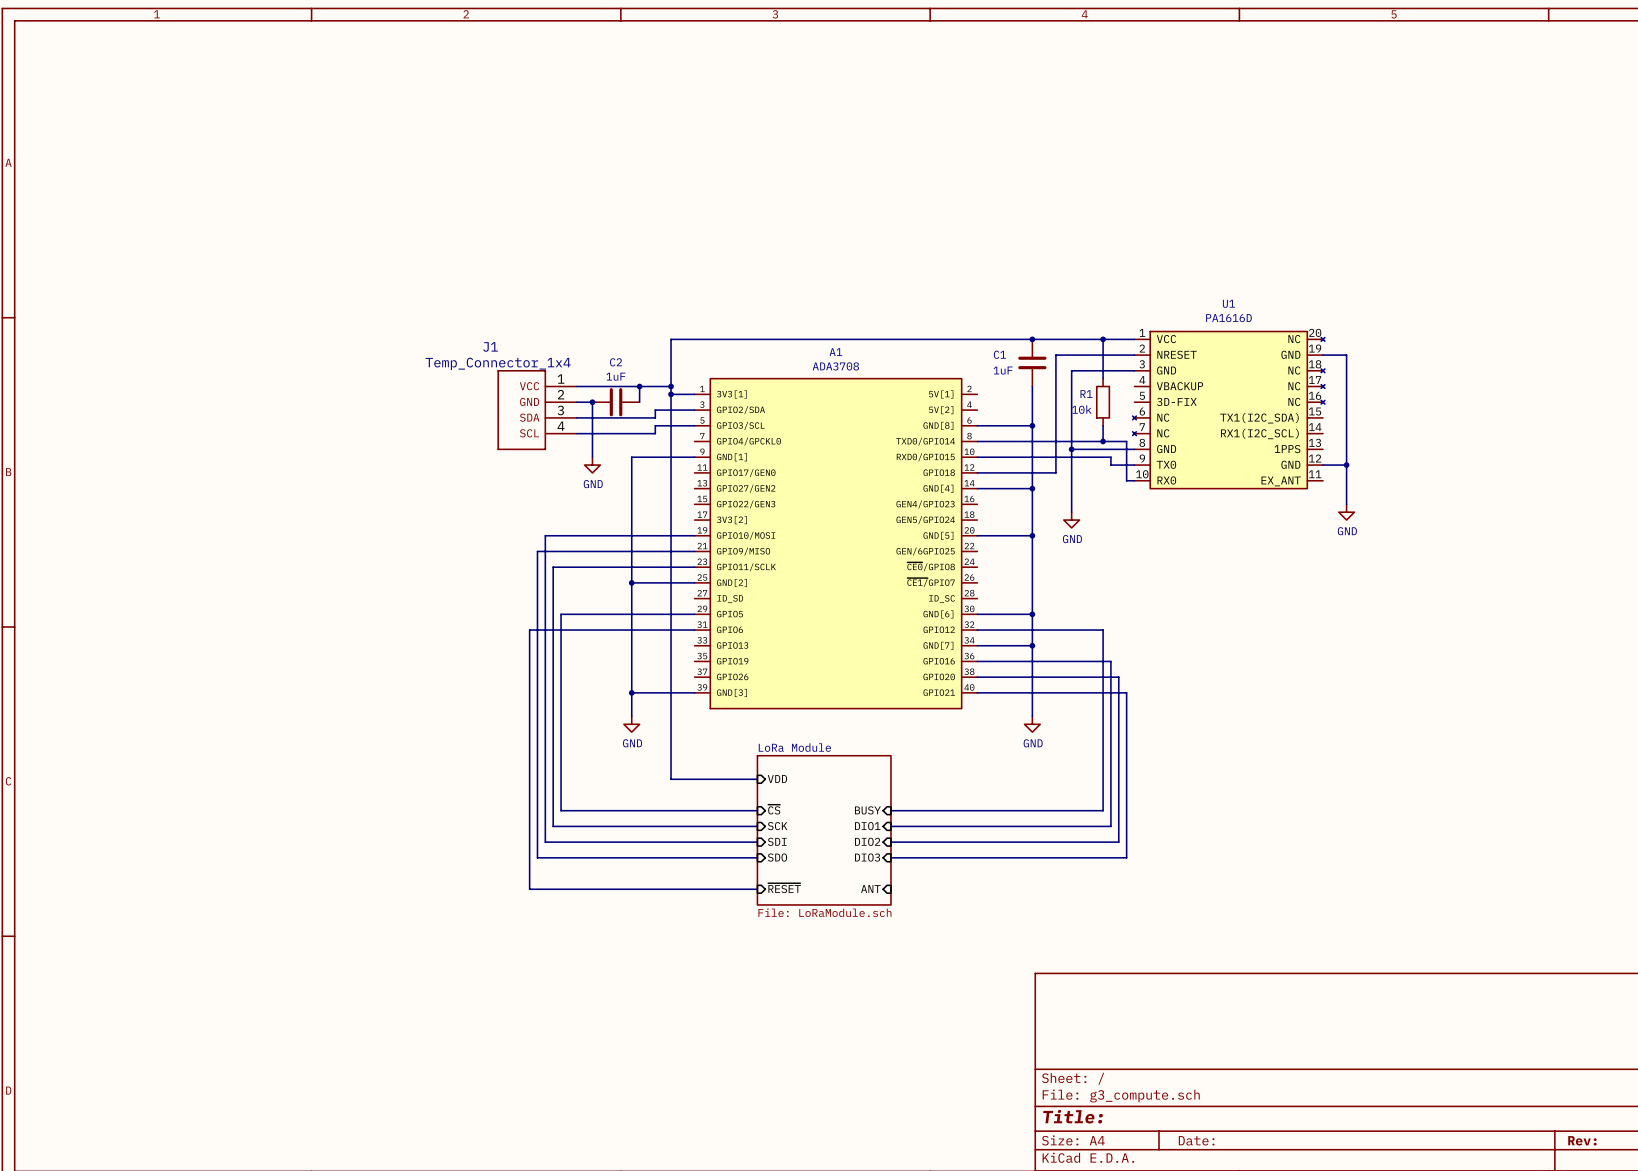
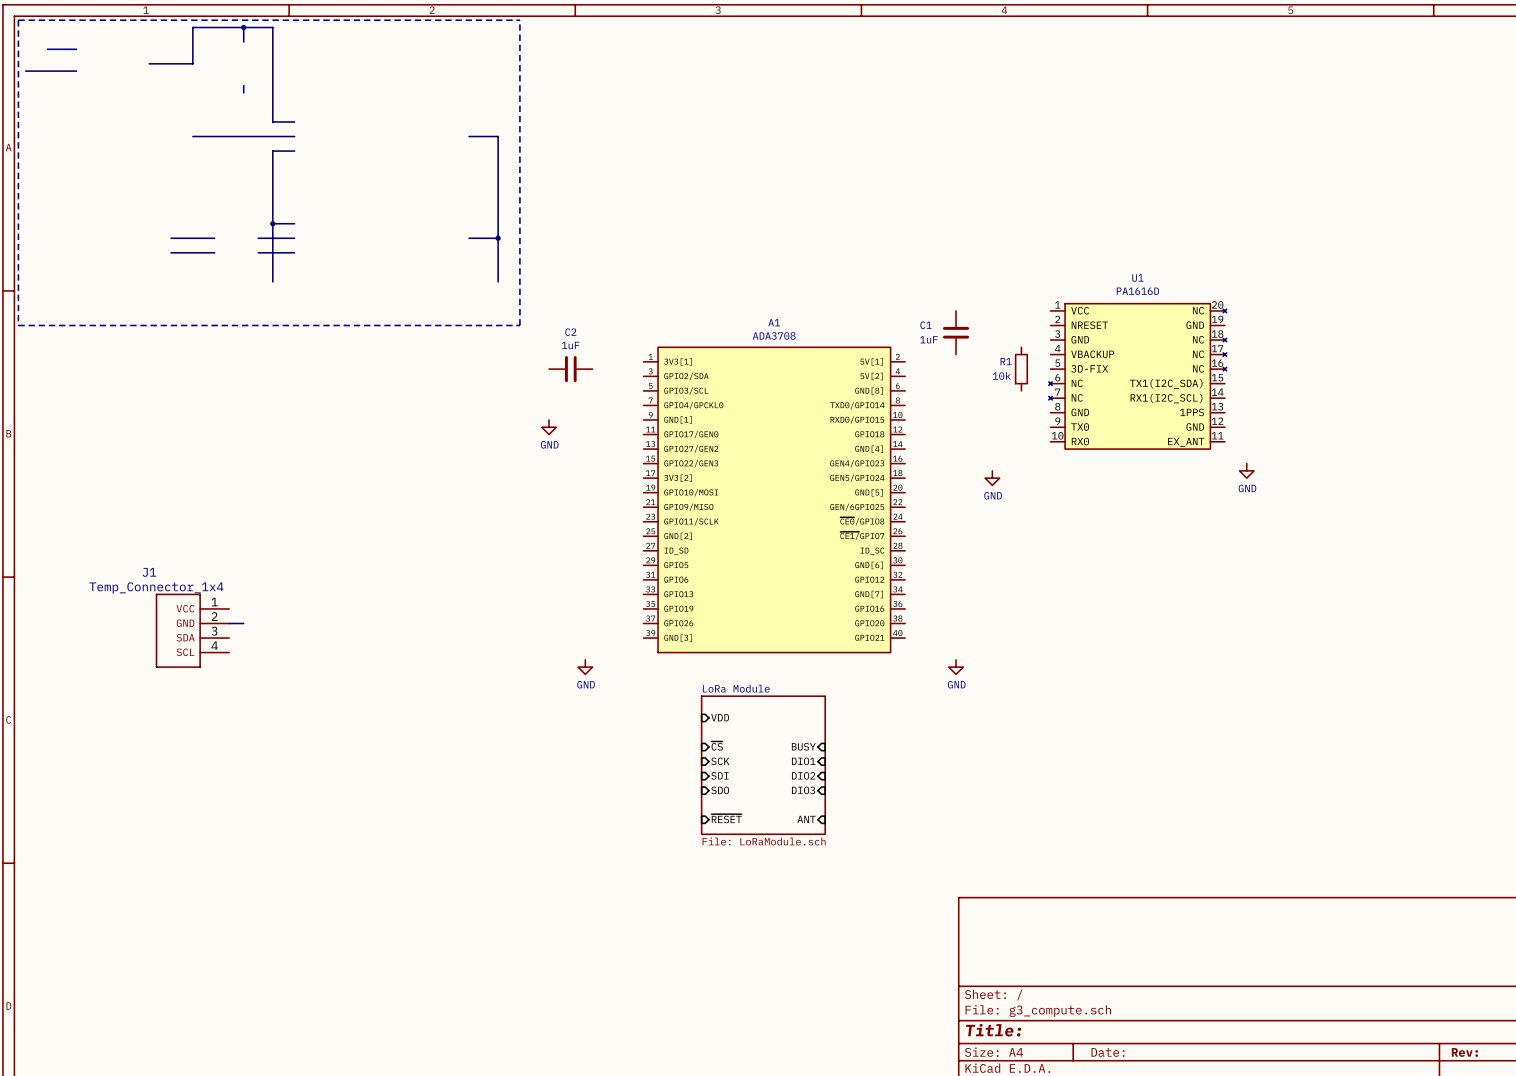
line: none -> (18, 20) (18, 325) (519, 325) (519, 20) (18, 20)
wire: none -> (243, 27) (243, 42)
junction: none -> (243, 27)
wire: none -> (47, 49) (76, 49)
wire: none -> (149, 63) (192, 63) (192, 27) (272, 27) (272, 121) (294, 121)
wire: none -> (25, 71) (76, 71)
wire: none -> (243, 85) (243, 92)
wire: none -> (192, 136) (294, 136)
wire: none -> (469, 136) (498, 136) (498, 281)
wire: none -> (294, 151) (272, 151) (272, 281)
wire: none -> (272, 223) (294, 223)
junction: none -> (272, 223)
wire: none -> (171, 238) (214, 238)
wire: none -> (258, 238) (294, 238)
wire: none -> (469, 238) (498, 238)
junction: none -> (498, 238)
wire: none -> (171, 252) (214, 252)
wire: none -> (258, 252) (294, 252)
junction: (1032, 339) -> none
wire: (1103, 339) (1103, 378) -> none
junction: (1103, 339) -> none
wire: (1134, 339) (671, 339) (671, 779) (757, 779) -> none
wire: (1134, 355) (1055, 355) (1055, 472) (977, 472) -> none
wire: (1323, 355) (1346, 355) (1346, 504) -> none
wire: (1134, 370) (1071, 370) (1071, 512) -> none
wire: (576, 386) (671, 386) -> none
wire: (639, 386) (639, 402) -> none
junction: (639, 386) -> none
junction: (671, 386) -> none
wire: (1032, 386) (1032, 716) -> none
wire: (671, 394) (694, 394) -> none
junction: (671, 394) -> none
wire: (576, 402) (592, 402) (592, 457) -> none
junction: (592, 402) -> none
J1 position: (537, 410) -> (192, 630)
wire: (694, 410) (655, 410) (655, 417) (576, 417) -> none
wire: (694, 425) (655, 425) (655, 433) (576, 433) -> none
wire: (977, 425) (1032, 425) -> none
junction: (1032, 425) -> none
wire: (1103, 425) (1103, 441) -> none
wire: (977, 441) (1126, 441) (1126, 480) (1134, 480) -> none
junction: (1103, 441) -> none
wire: (1071, 449) (1134, 449) -> none
junction: (1071, 449) -> none
wire: (694, 457) (631, 457) (631, 716) -> none
wire: (977, 457) (1110, 457) (1110, 465) (1134, 465) -> none
wire: (1323, 465) (1346, 465) -> none
junction: (1346, 465) -> none
wire: (977, 488) (1032, 488) -> none
junction: (1032, 488) -> none
wire: (694, 535) (545, 535) (545, 842) (757, 842) -> none
wire: (977, 535) (1032, 535) -> none
junction: (1032, 535) -> none
wire: (694, 551) (537, 551) (537, 857) (757, 857) -> none
wire: (694, 567) (553, 567) (553, 826) (757, 826) -> none
wire: (631, 582) (694, 582) -> none
junction: (631, 582) -> none
wire: (694, 614) (561, 614) (561, 810) (757, 810) -> none
wire: (977, 614) (1032, 614) -> none
junction: (1032, 614) -> none
wire: (694, 630) (529, 630) (529, 889) (757, 889) -> none
wire: (977, 630) (1103, 630) (1103, 810) (890, 810) -> none
wire: (977, 645) (1032, 645) -> none
junction: (1032, 645) -> none
wire: (977, 661) (1110, 661) (1110, 826) (890, 826) -> none
wire: none -> (229, 623) (243, 623)
wire: (977, 677) (1118, 677) (1118, 842) (890, 842) -> none
wire: (631, 692) (694, 692) -> none
junction: (631, 692) -> none
wire: (977, 692) (1126, 692) (1126, 857) (890, 857) -> none

